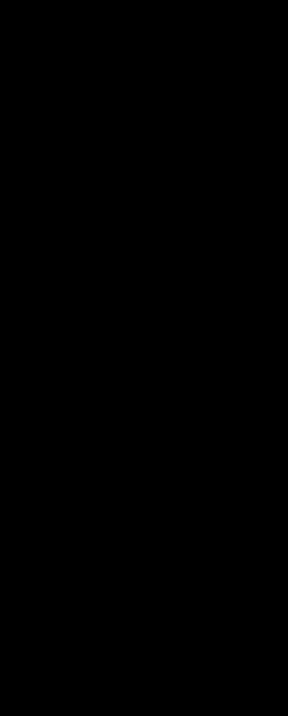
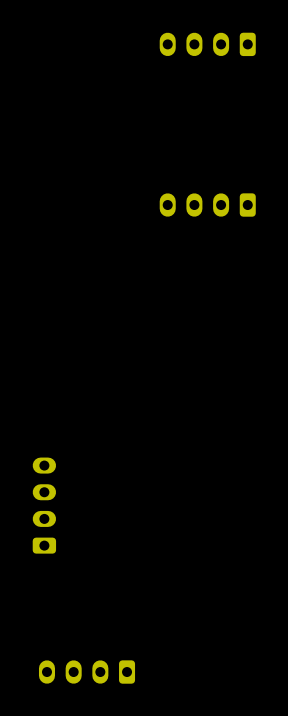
part: none -> (207, 44)
part: none -> (207, 205)
part: none -> (44, 505)
part: none -> (87, 672)

